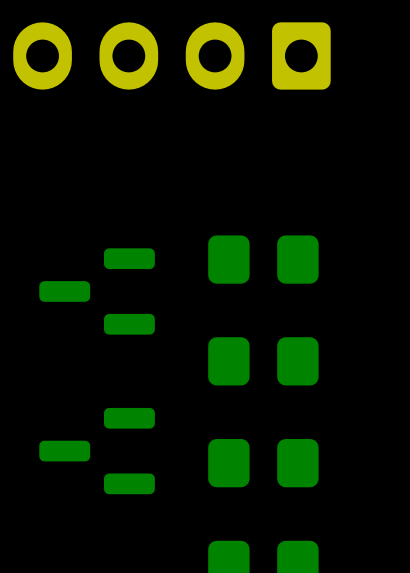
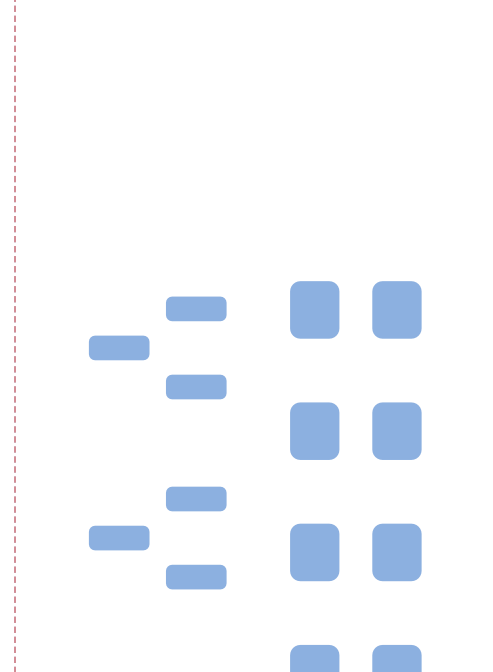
part: (171, 55) -> none

